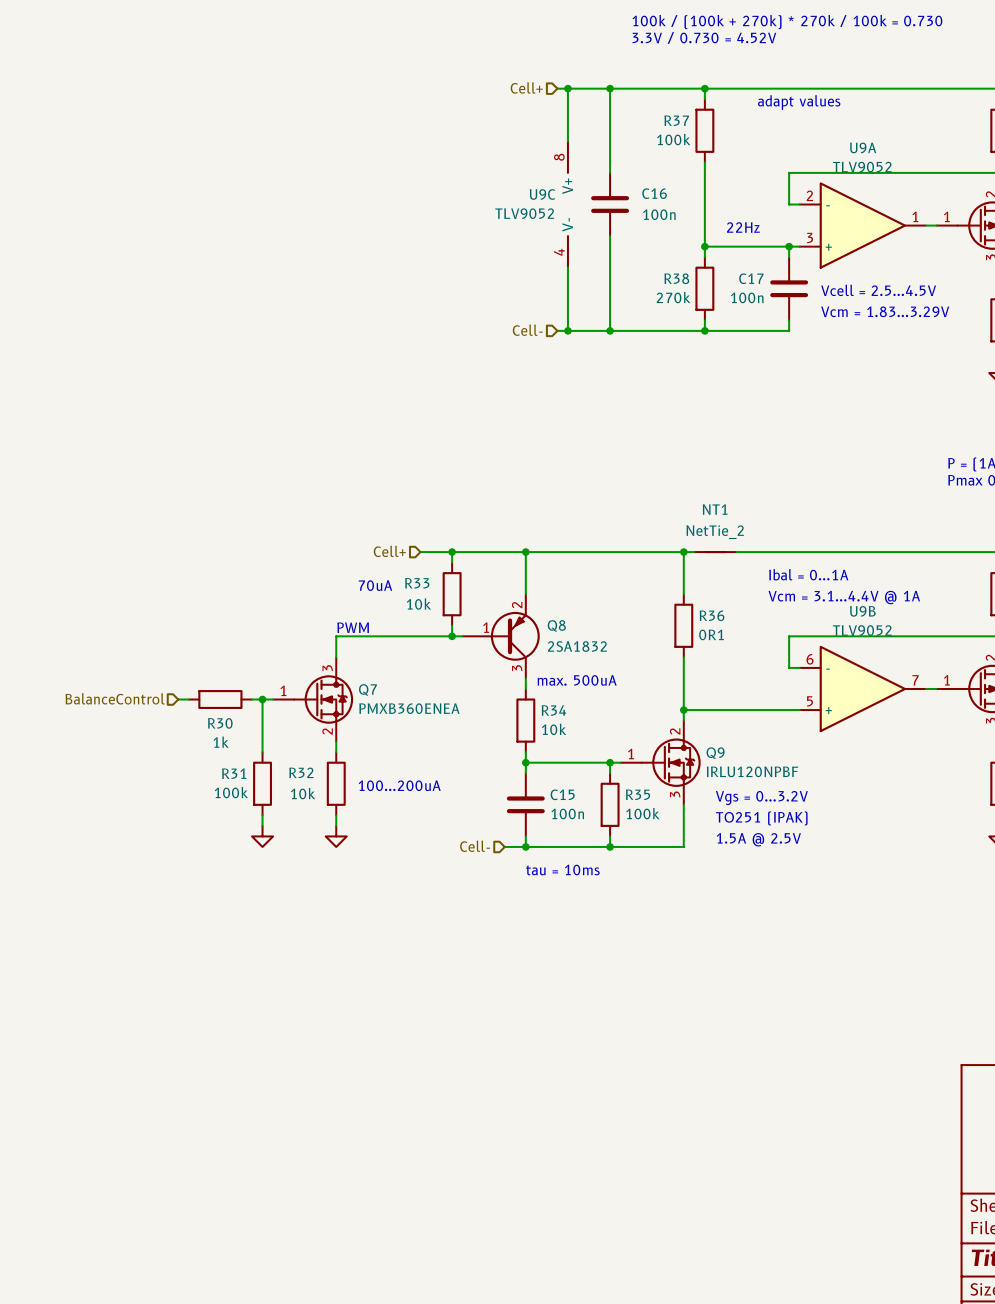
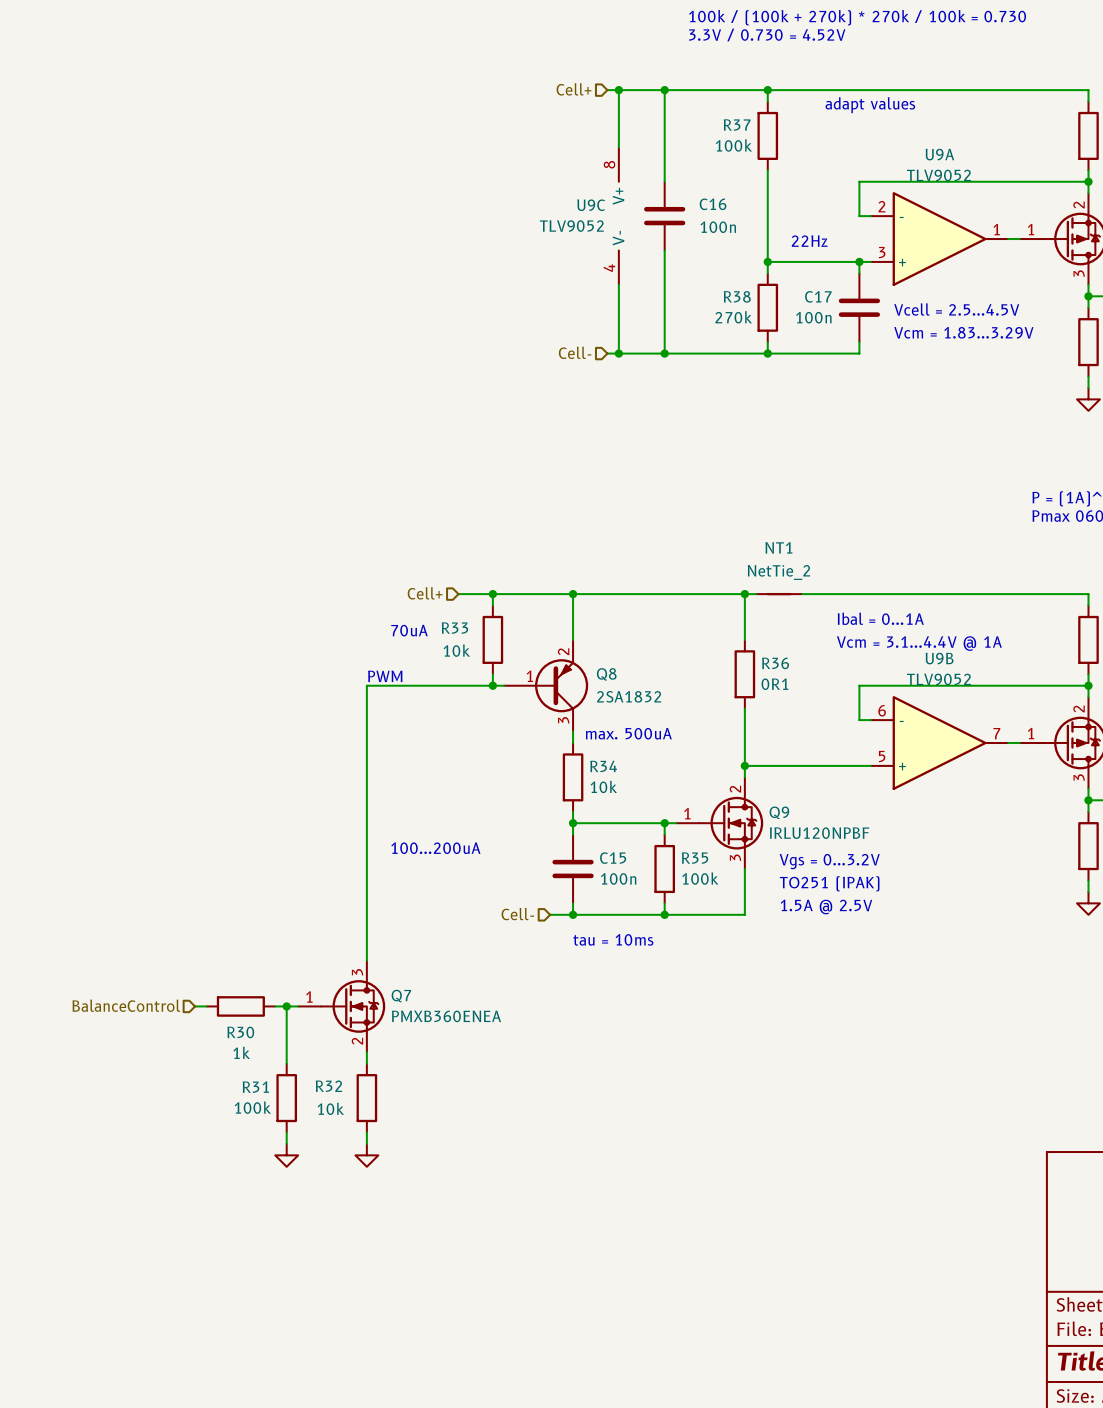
hierarchical label: BalanceControl (115, 698) -> none
wire: (178, 699) (188, 699) -> none
R30 position: (220, 699) -> (240, 1006)
wire: (252, 699) (273, 699) -> none
wire: (262, 699) (262, 752) -> none
junction: (262, 699) -> none
Q7 position: (313, 699) -> (341, 1006)
wire: none -> (366, 811) (366, 880)
R31 position: (262, 783) -> (286, 1098)
R32 position: (336, 783) -> (366, 1098)
wire: (262, 815) (262, 825) -> (366, 1052) (366, 1063)
wire: none -> (366, 891) (366, 960)
power symbol: (262, 836) -> none
power symbol: (336, 836) -> none
hierarchical label: none -> BalanceControl (126, 1005)
wire: none -> (195, 1006) (206, 1006)
wire: none -> (275, 1006) (298, 1006)
wire: none -> (286, 1006) (286, 1063)
junction: none -> (286, 1006)
wire: none -> (286, 1132) (286, 1143)
wire: none -> (366, 1132) (366, 1143)
power symbol: none -> (286, 1155)
power symbol: none -> (366, 1155)

